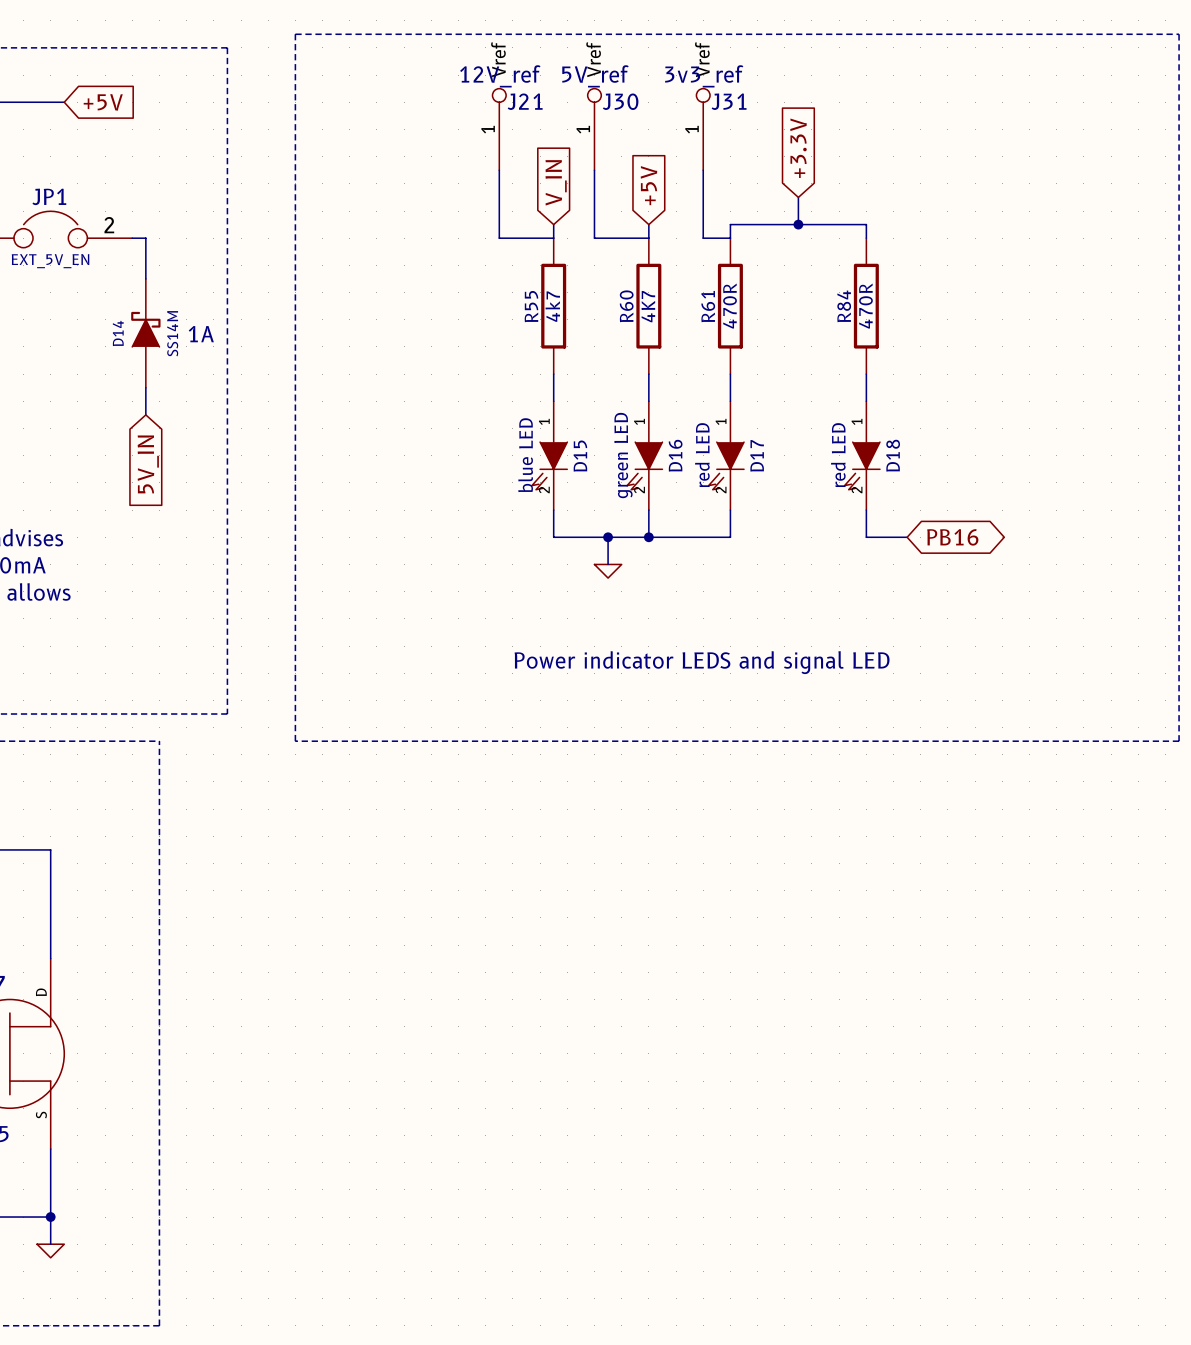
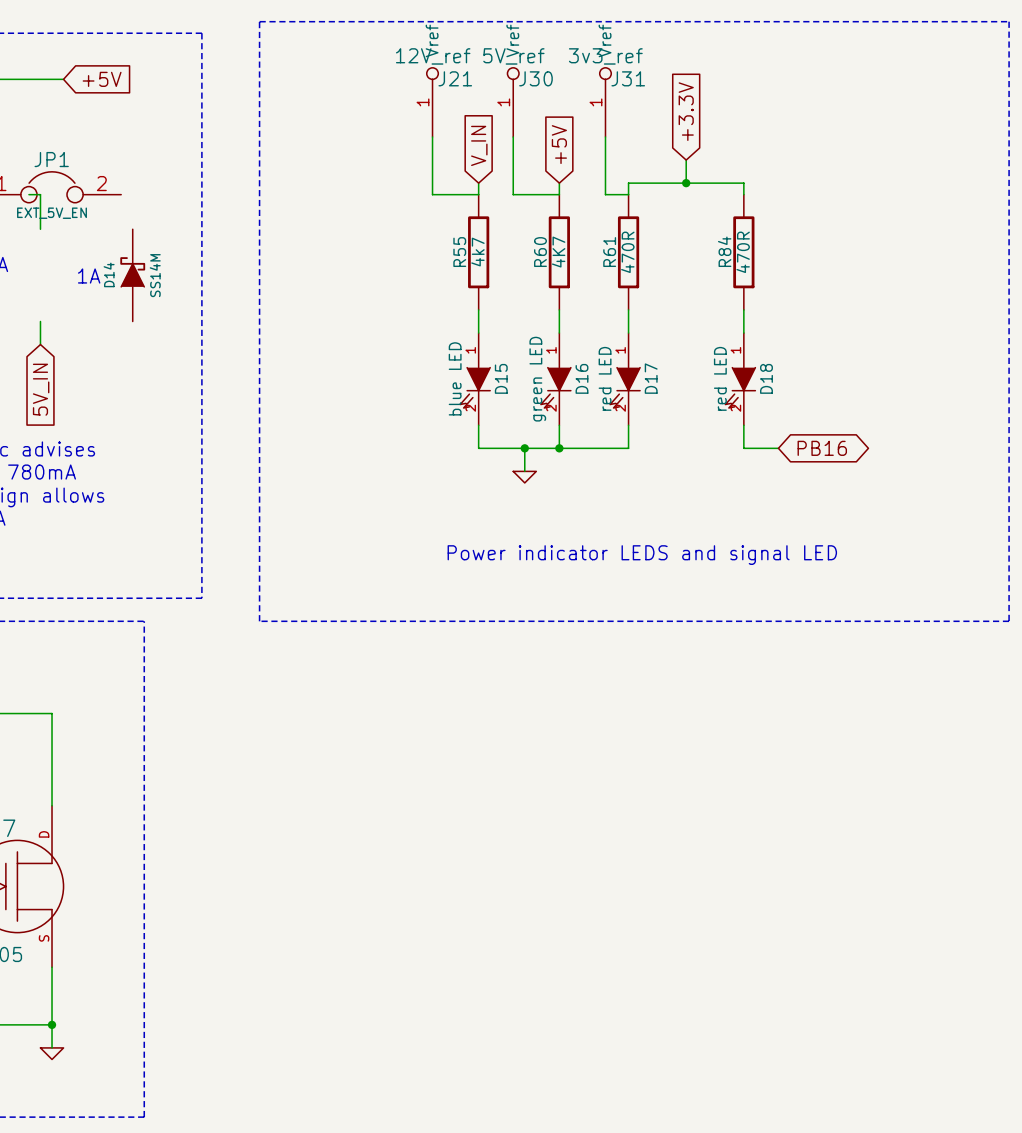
wire: (132, 238) (145, 238) (145, 278) -> (28, 194) (40, 194) (40, 229)
text position: 1A (201, 334) -> 1A (89, 276)
wire: (145, 387) (145, 414) -> (40, 321) (40, 344)
global label position: 5V_IN (148, 464) -> 5V_IN (41, 389)

